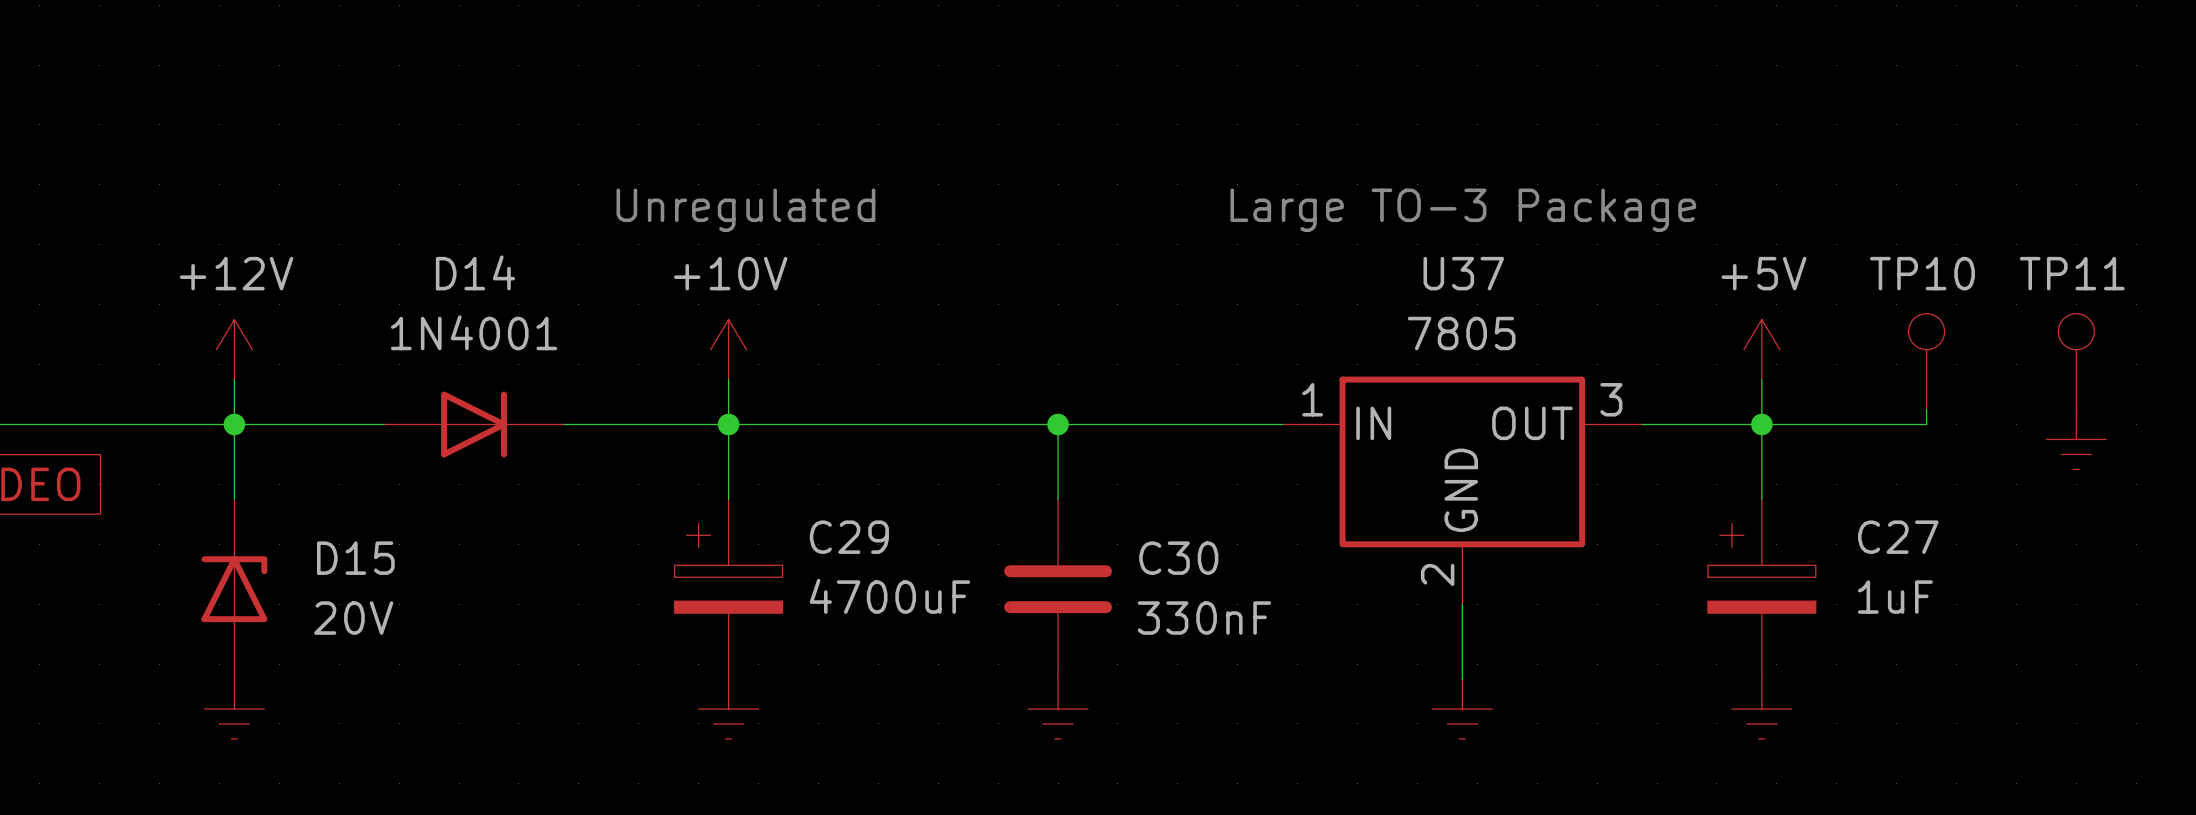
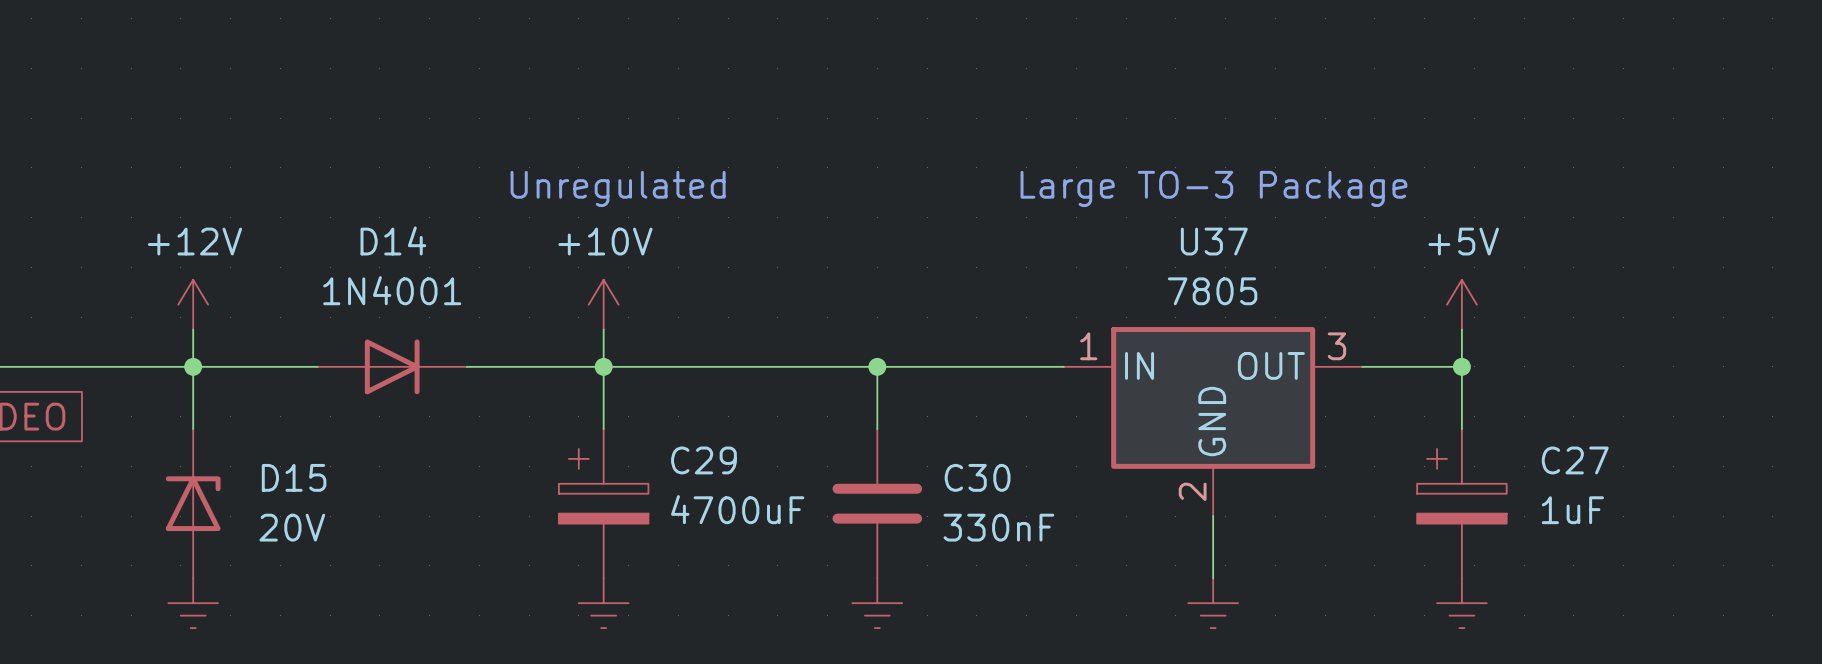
TP10: (1926, 361) -> none
TP11: (2076, 361) -> none
wire: (1926, 409) (1926, 424) (1761, 424) -> none
power symbol: (2076, 439) -> none

